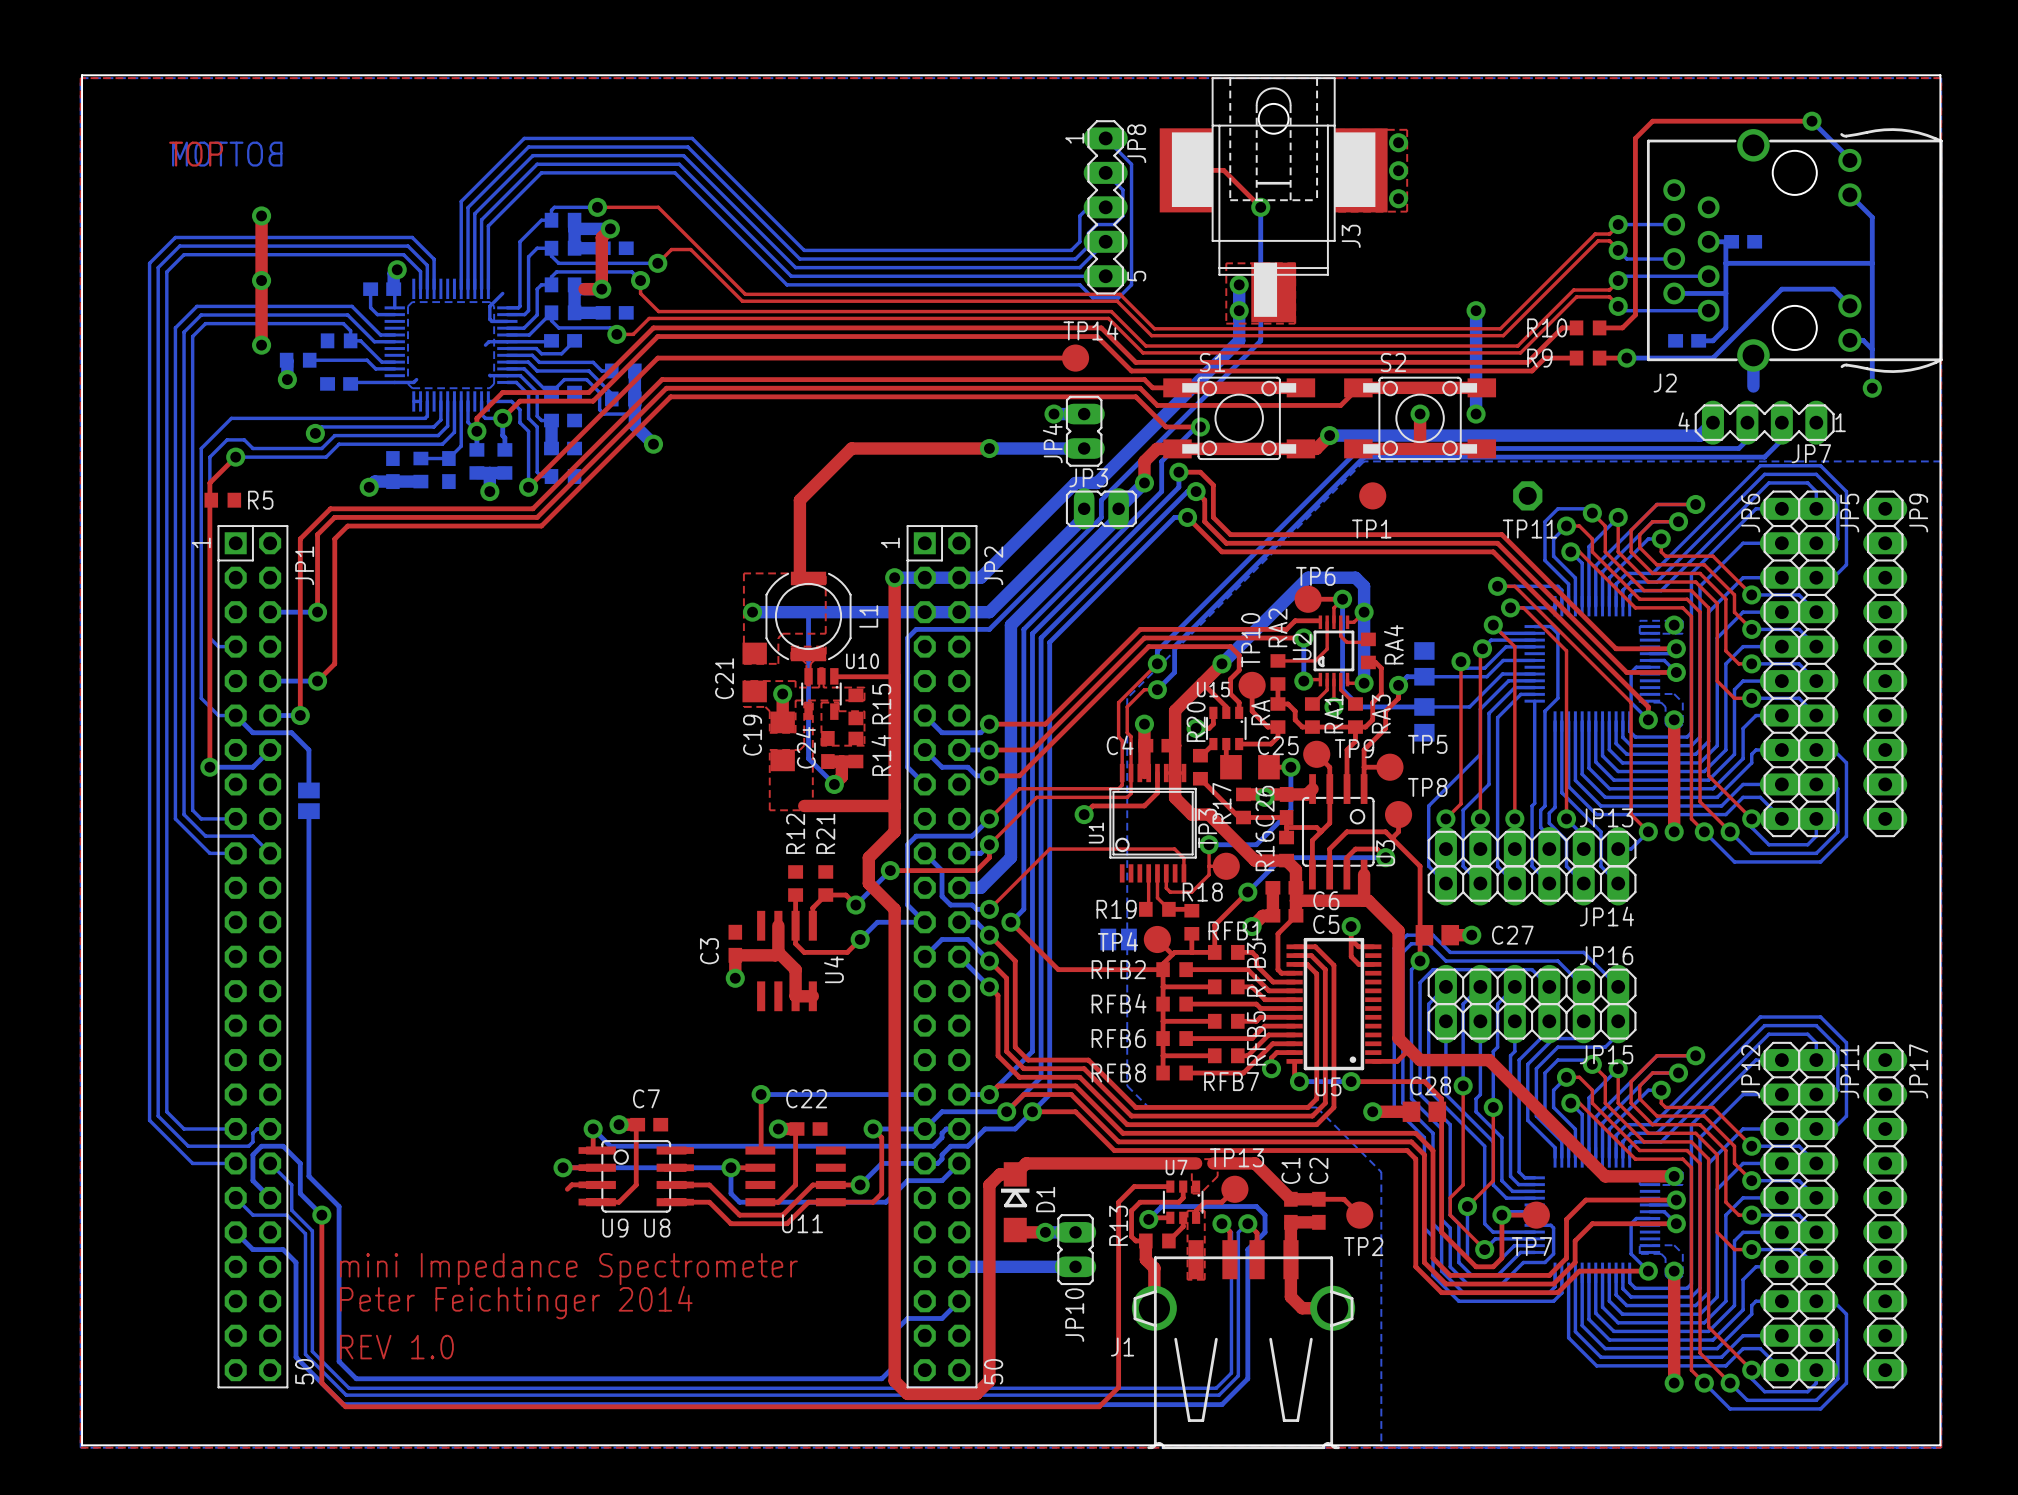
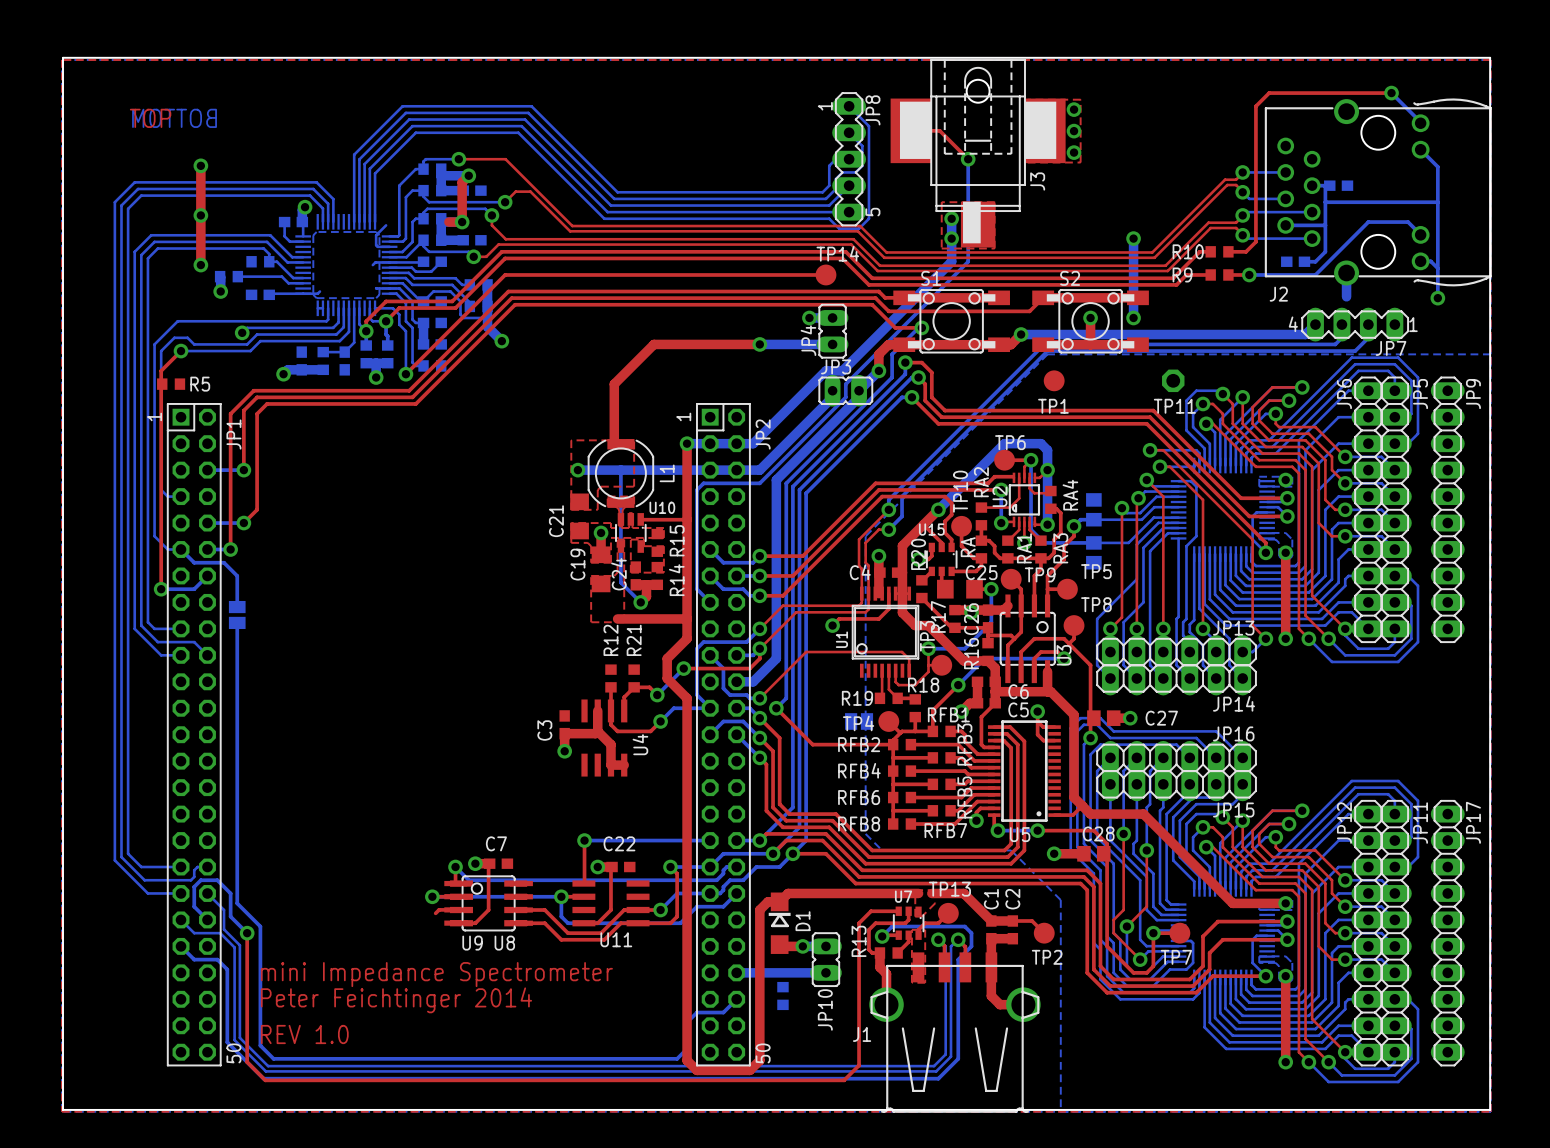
part: none -> (782, 996)

